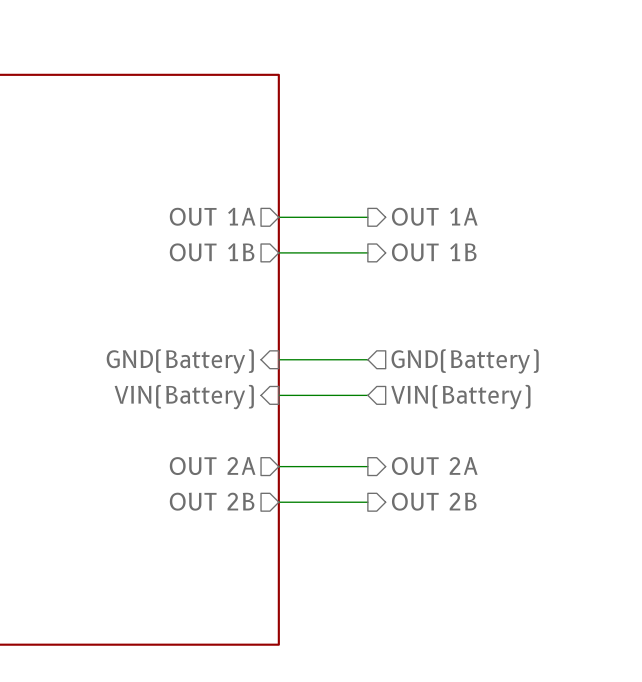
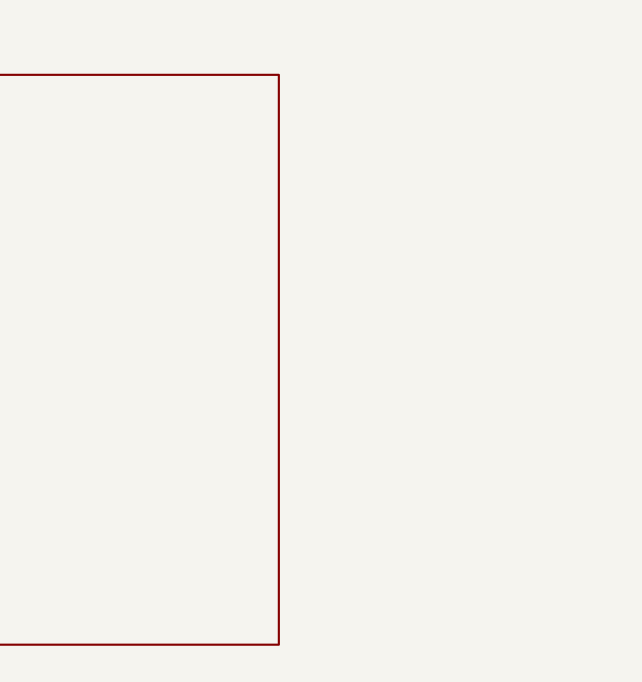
sheet pin: OUT 1A (212, 216) -> none
hierarchical label: OUT 1A (434, 216) -> none
wire: (278, 217) (367, 217) -> none
sheet pin: OUT 1B (212, 252) -> none
wire: (278, 252) (367, 252) -> none
hierarchical label: OUT 1B (434, 252) -> none
wire: (278, 359) (367, 359) -> none
sheet pin: GND(Battery) (180, 361) -> none
hierarchical label: GND(Battery) (465, 361) -> none
wire: (278, 395) (367, 395) -> none
sheet pin: VIN(Battery) (184, 397) -> none
hierarchical label: VIN(Battery) (460, 397) -> none
sheet pin: OUT 2A (212, 466) -> none
wire: (278, 466) (367, 466) -> none
hierarchical label: OUT 2A (434, 466) -> none
sheet pin: OUT 2B (212, 501) -> none
hierarchical label: OUT 2B (434, 501) -> none
wire: (278, 502) (367, 502) -> none

